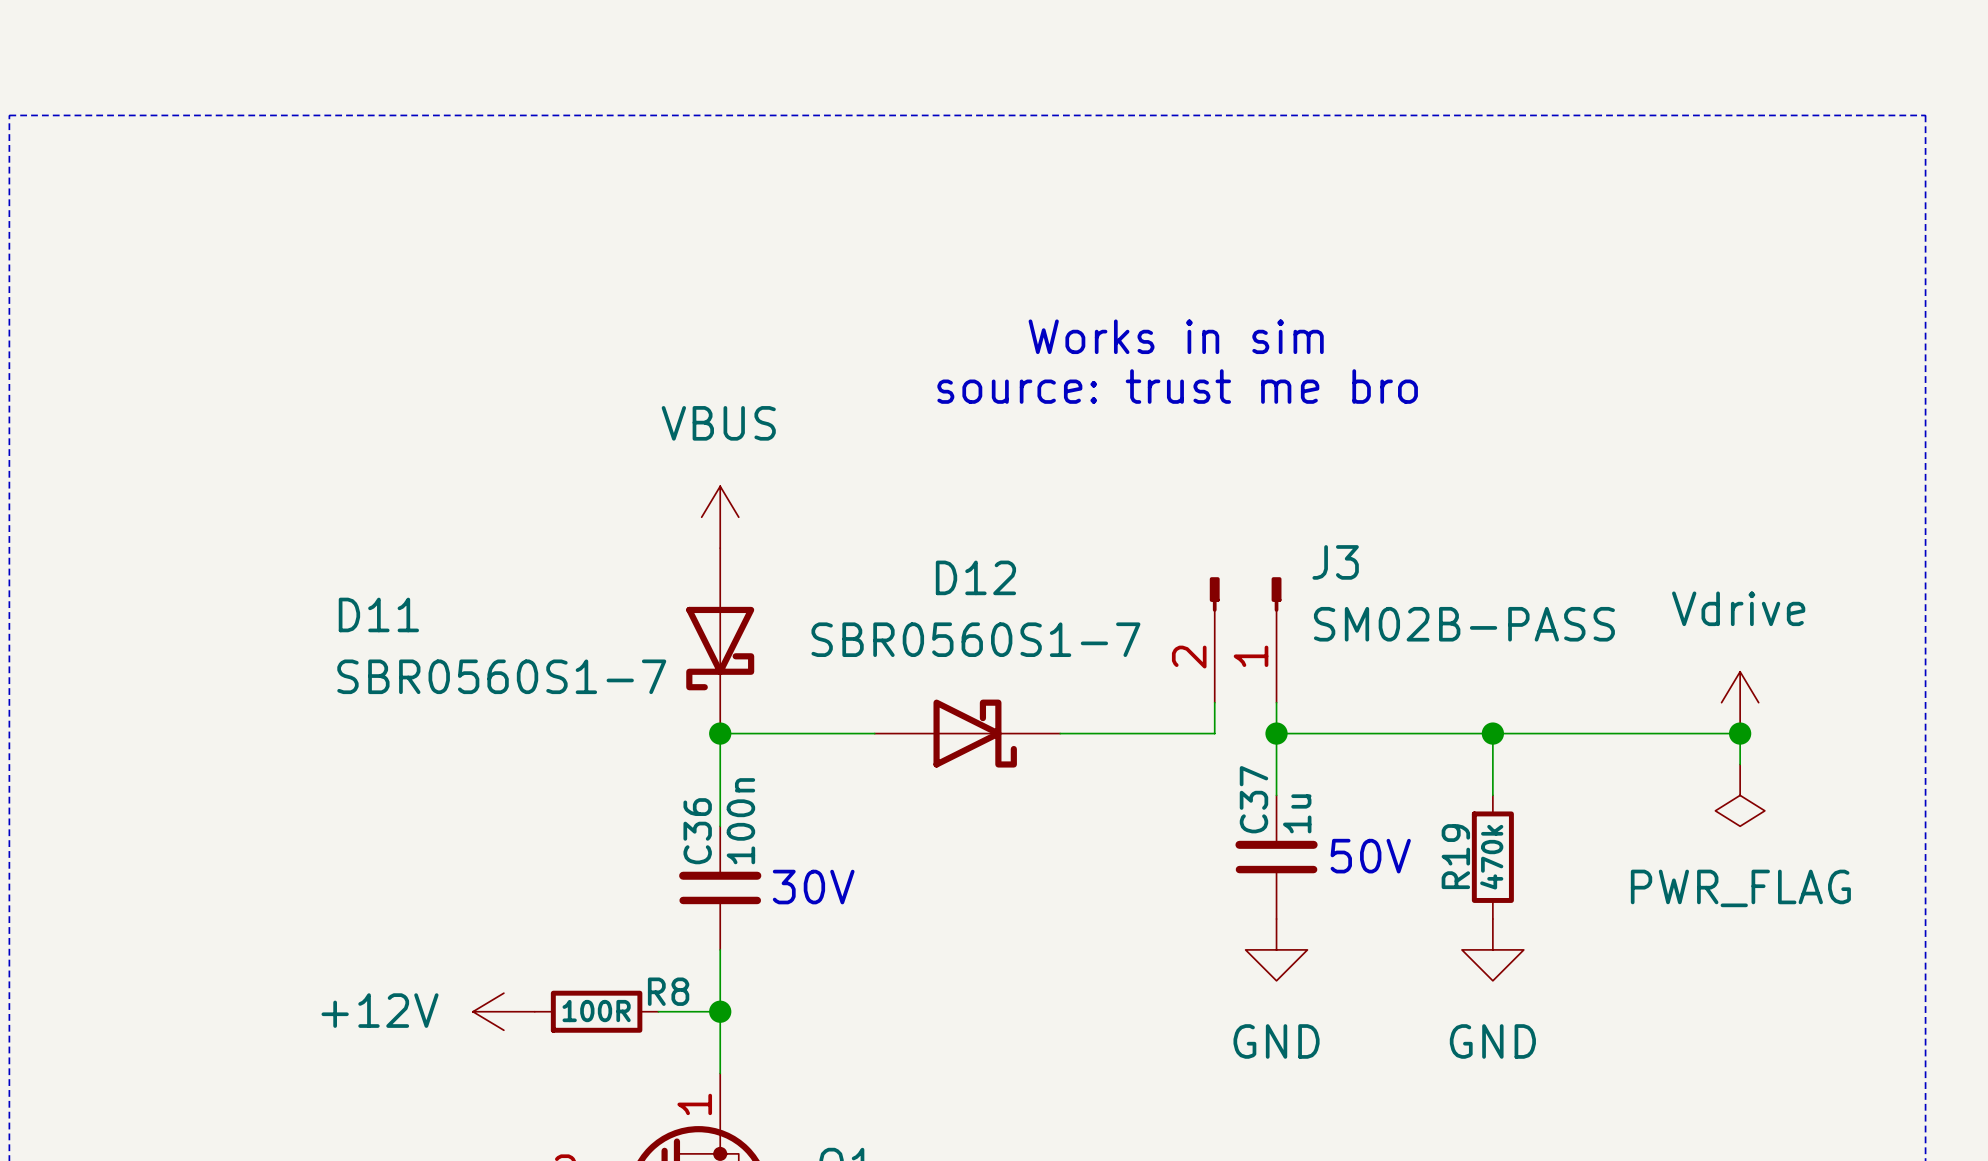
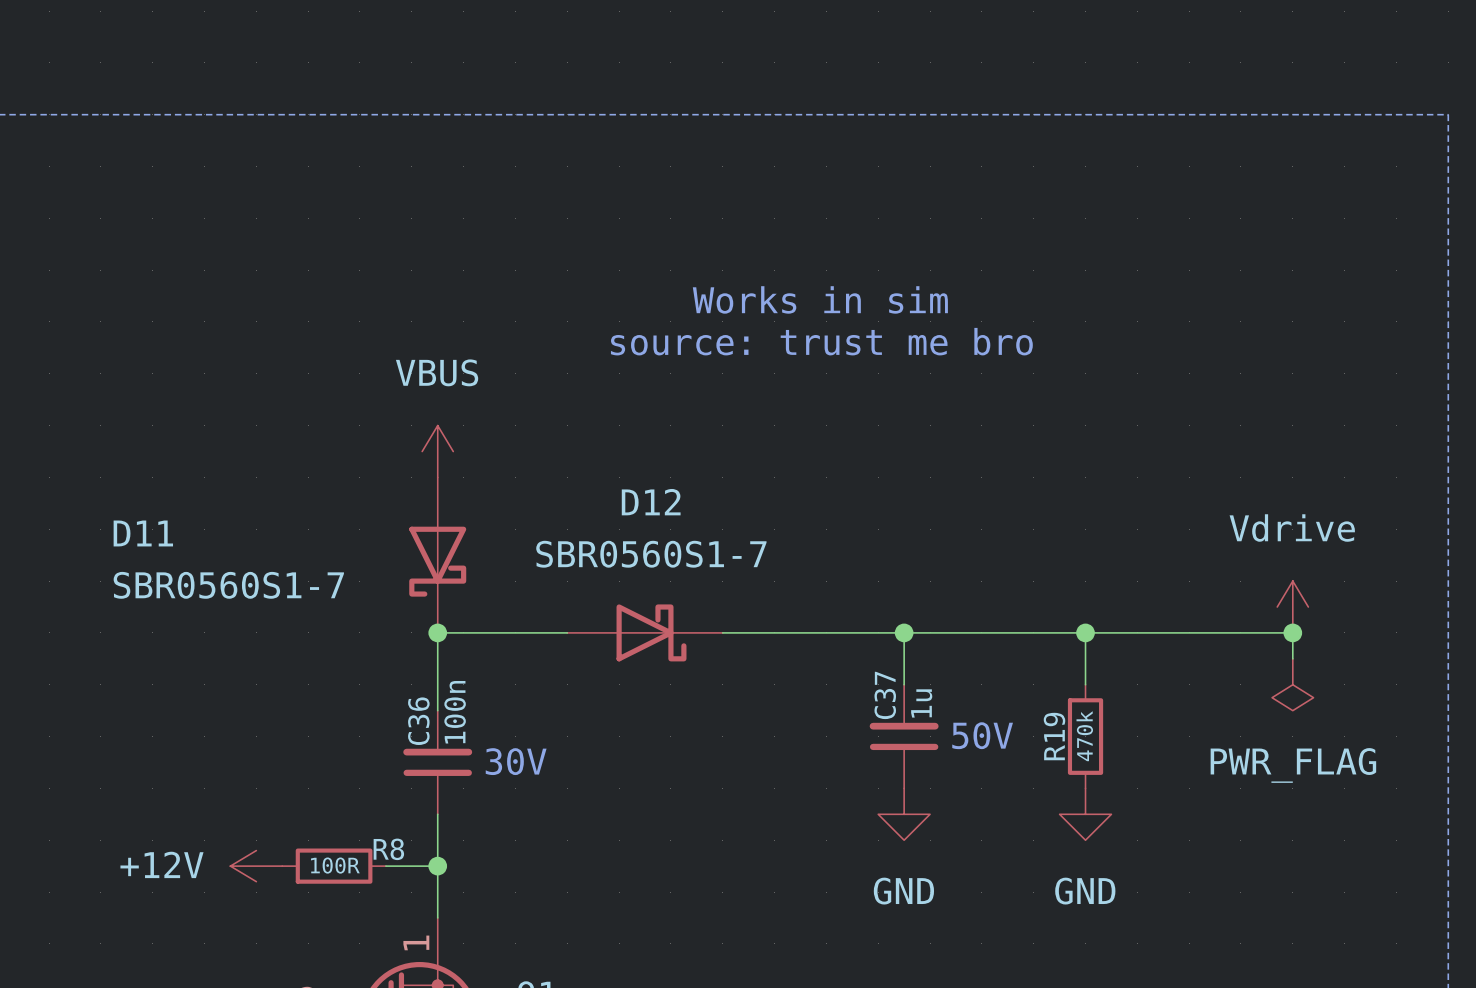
J3: SM02B-PASS (1245, 639) -> none
wire: (1214, 702) (1214, 733) -> (904, 632) (852, 632)
wire: (1276, 702) (1276, 733) -> none

